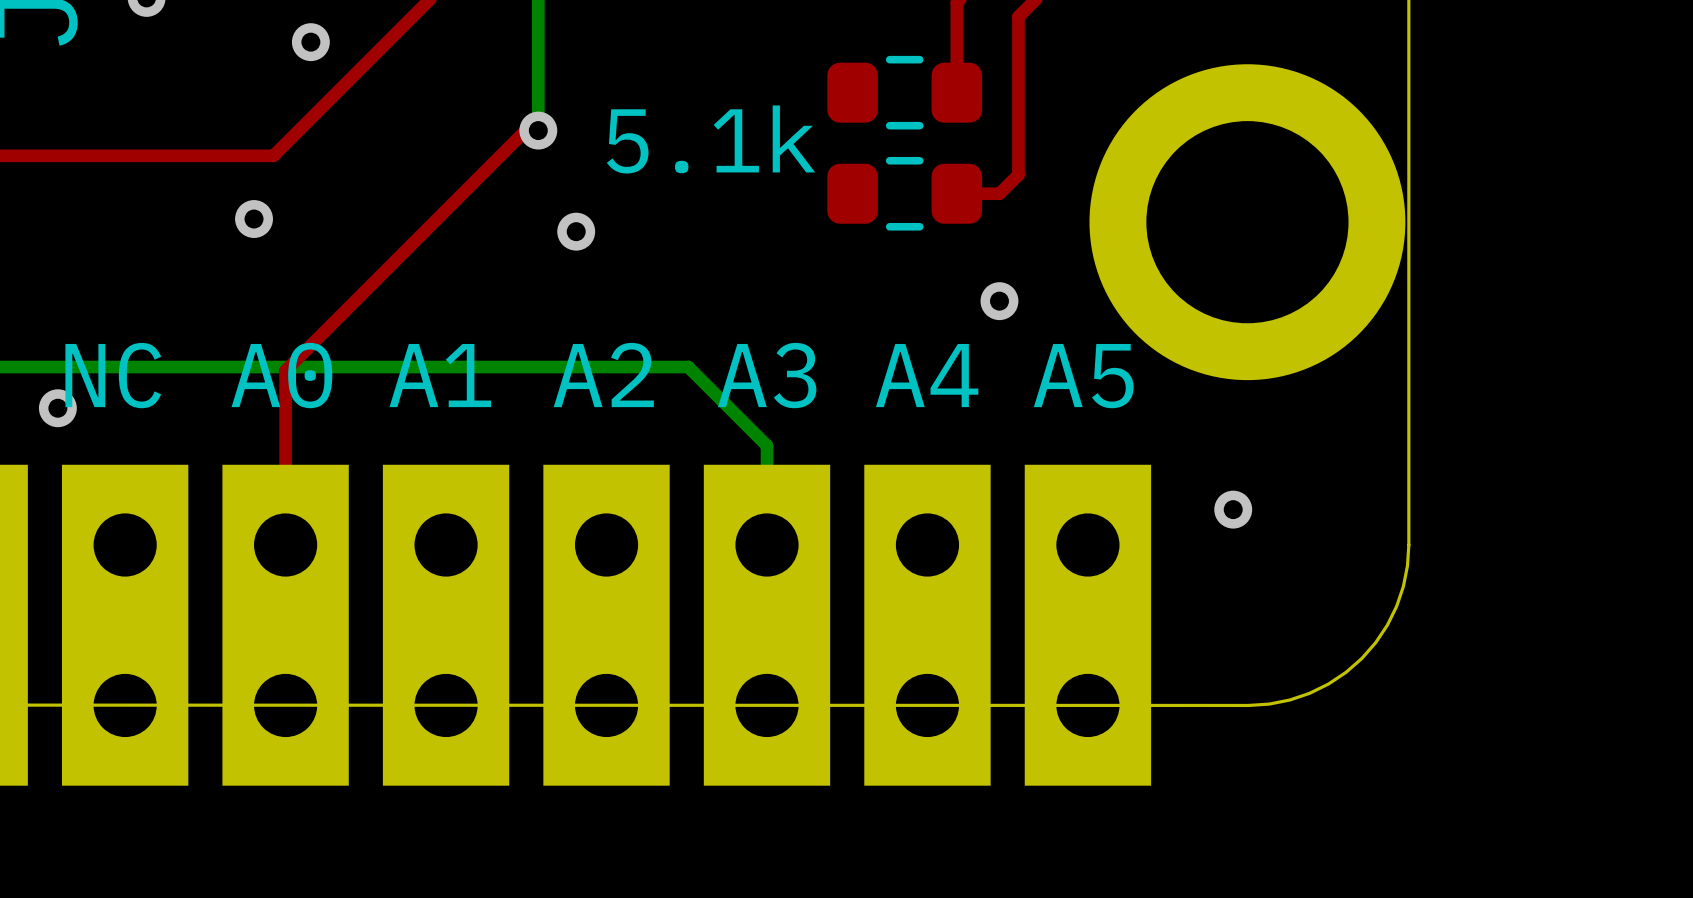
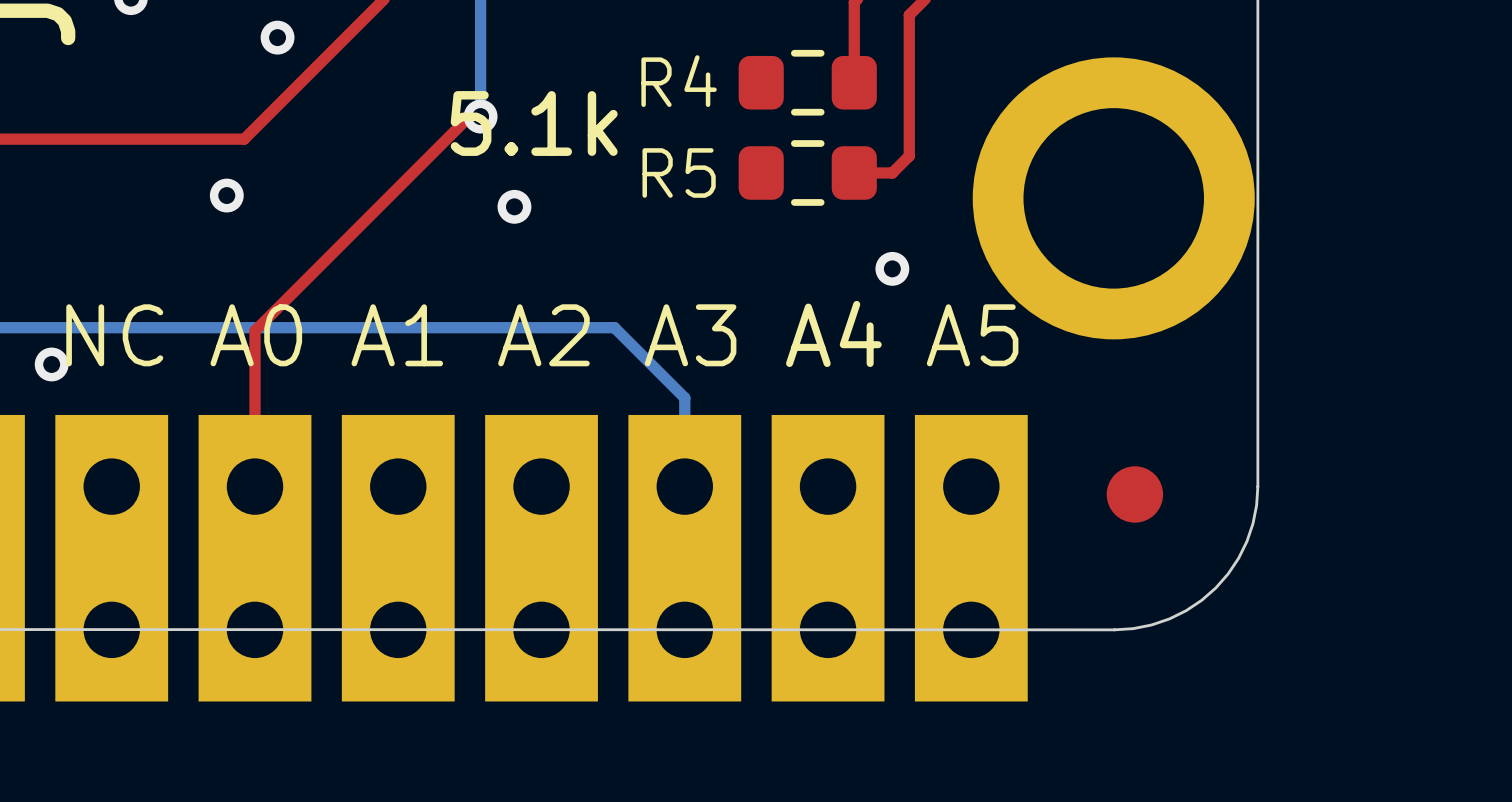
R4 name: none -> R4 (679, 81)
R4 value position: 5.1k (711, 139) -> 5.1k (534, 123)
R5 name: none -> R5 (679, 172)
via: (1233, 509) -> none
part: none -> (1134, 494)

